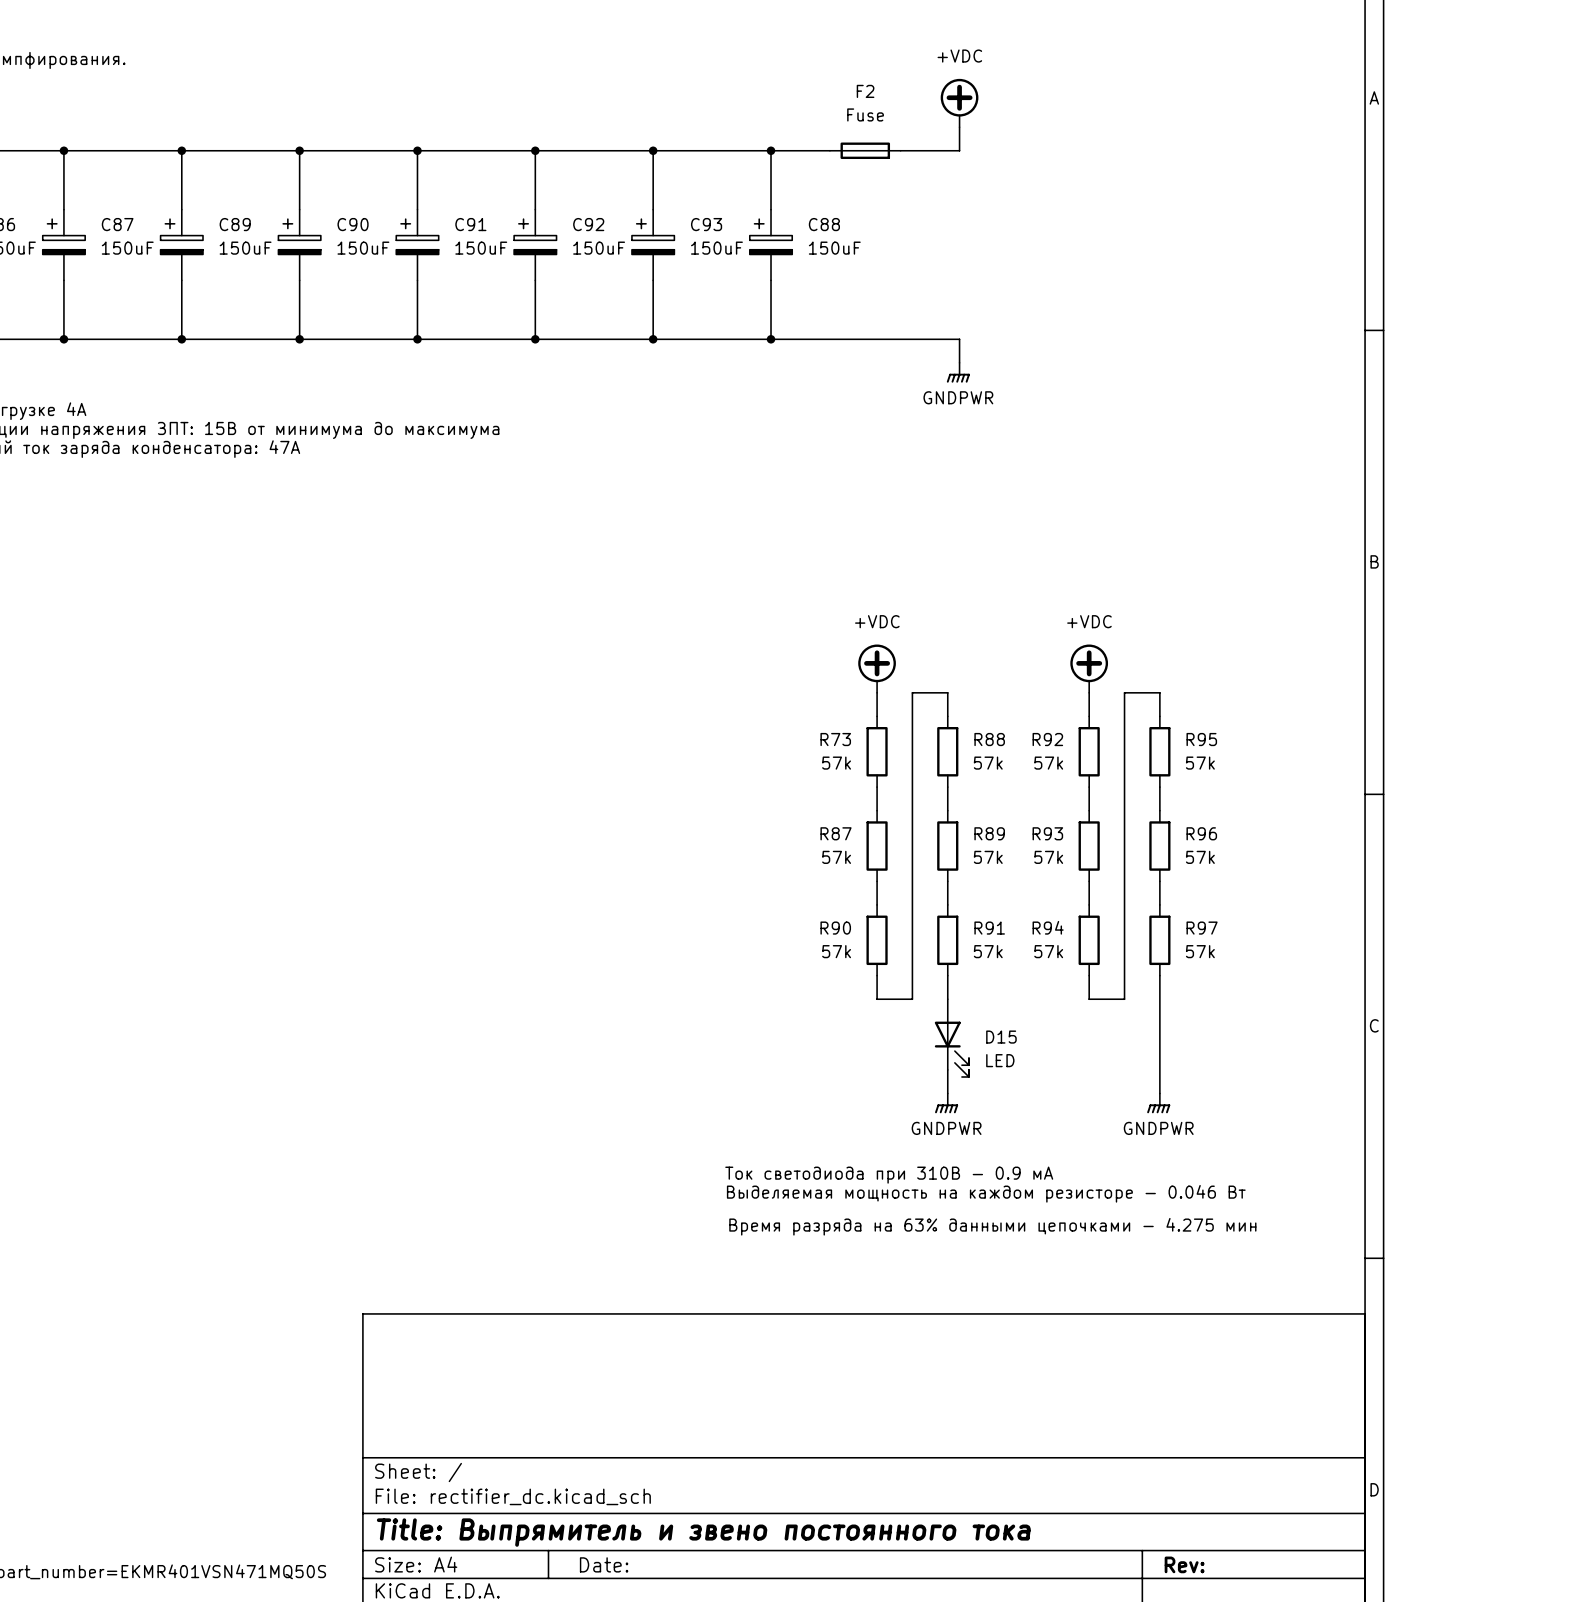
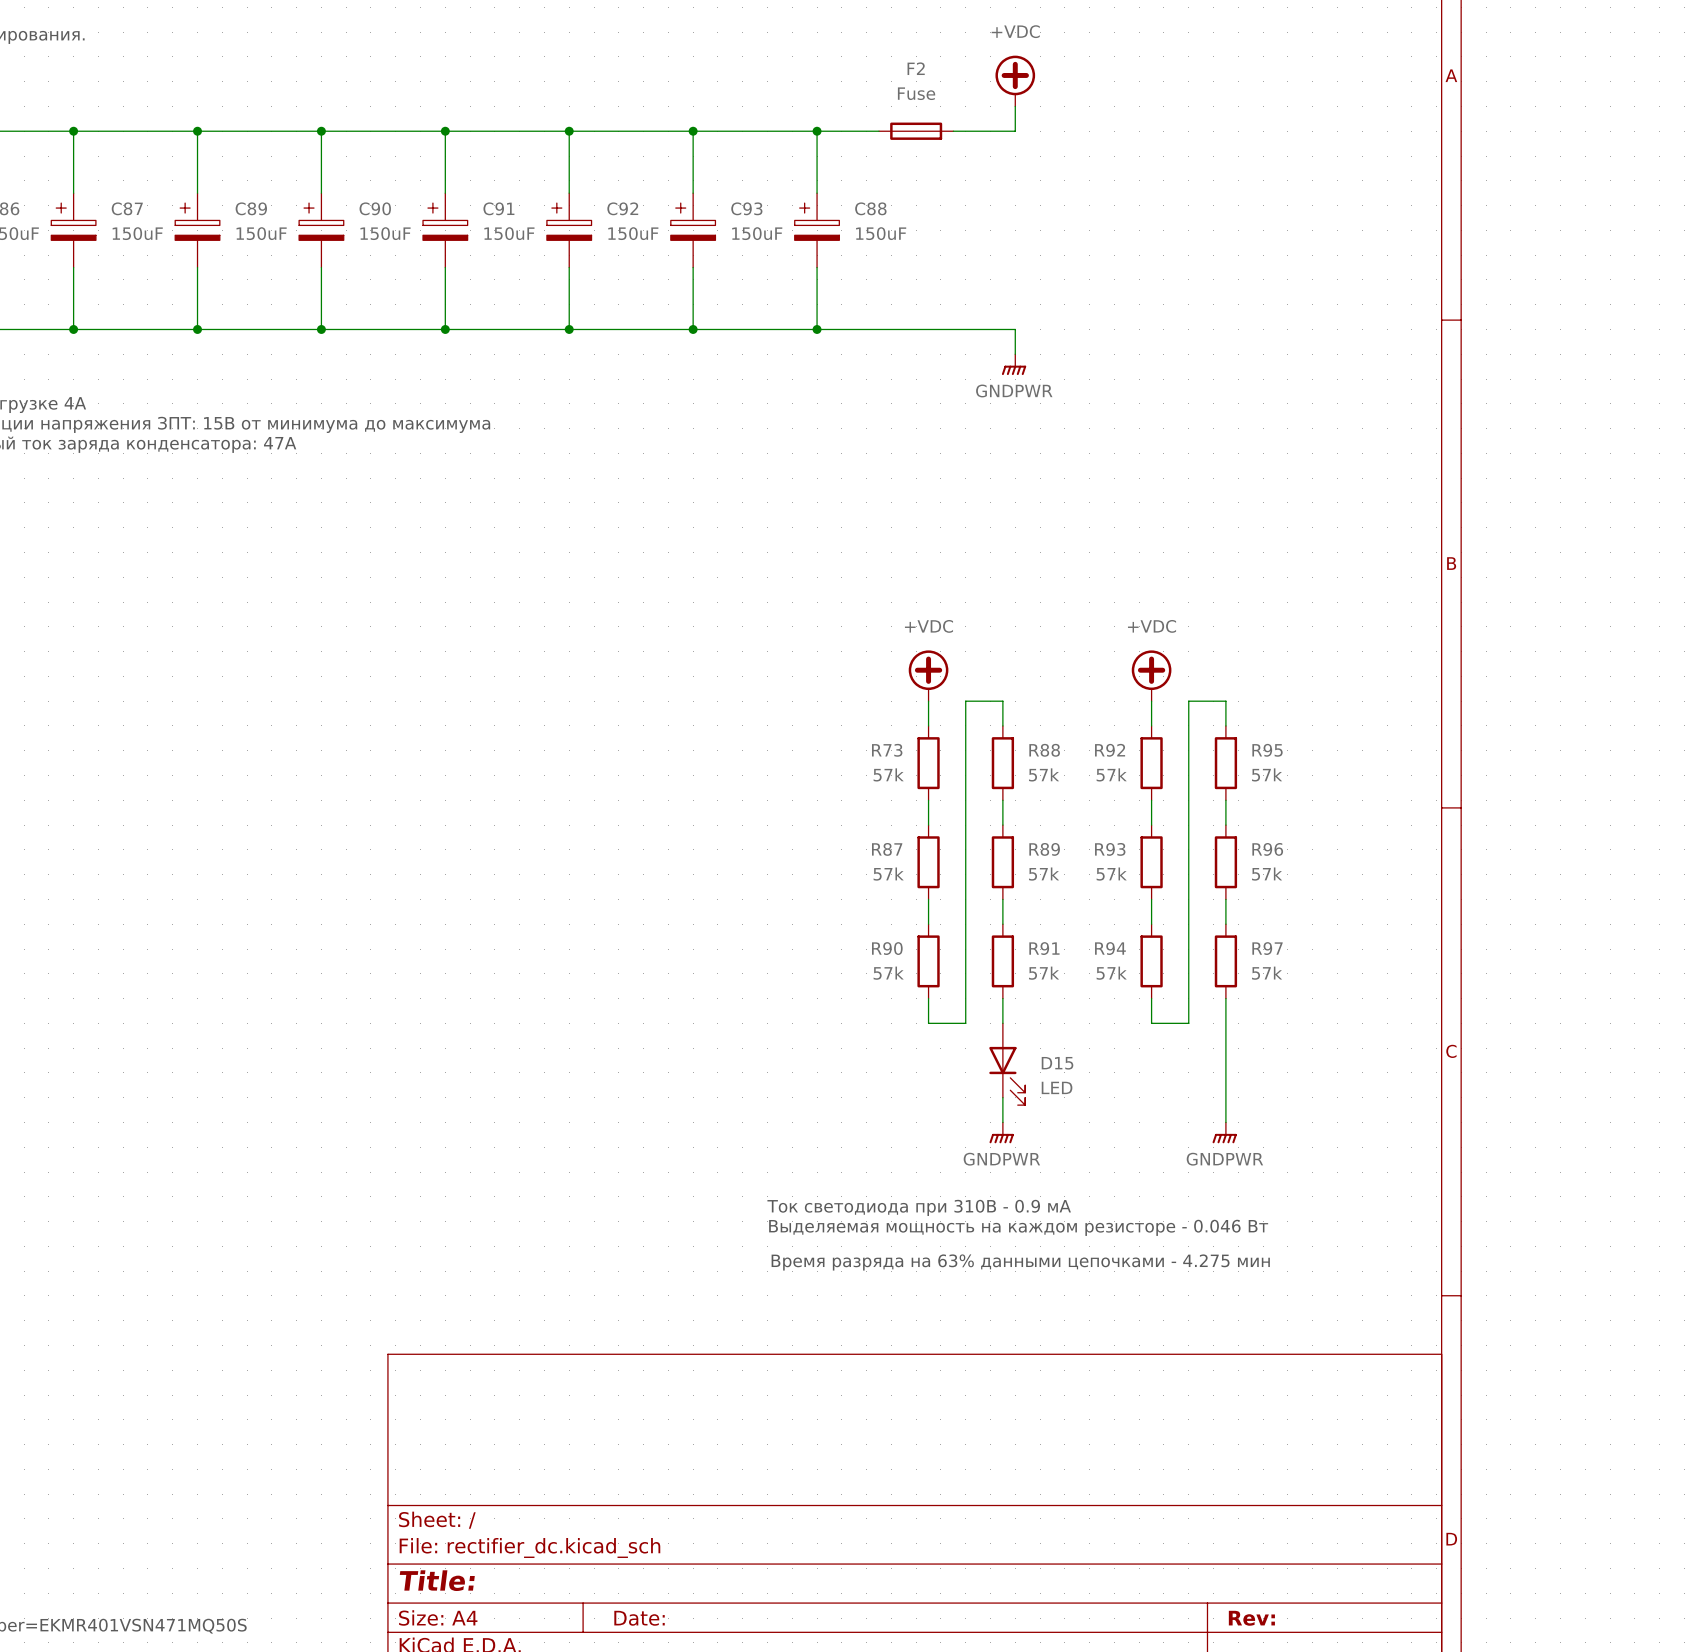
title block: Title: Выпрямитель и звено постоянного тока (703, 1532) -> Title: (437, 1580)

